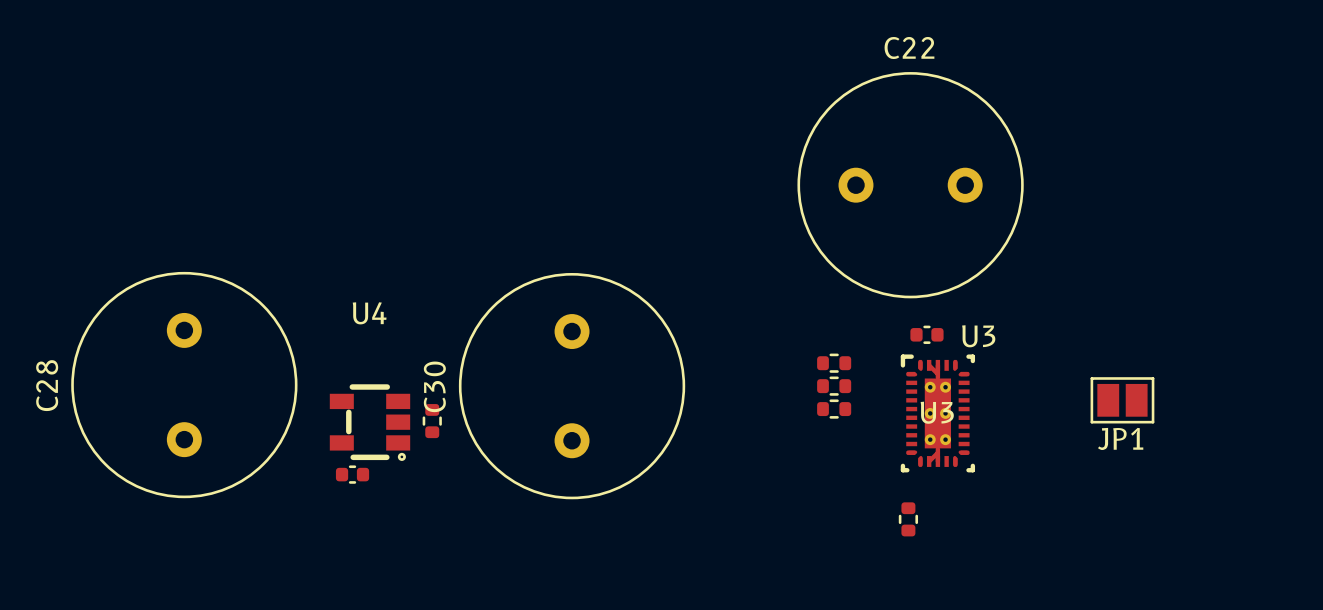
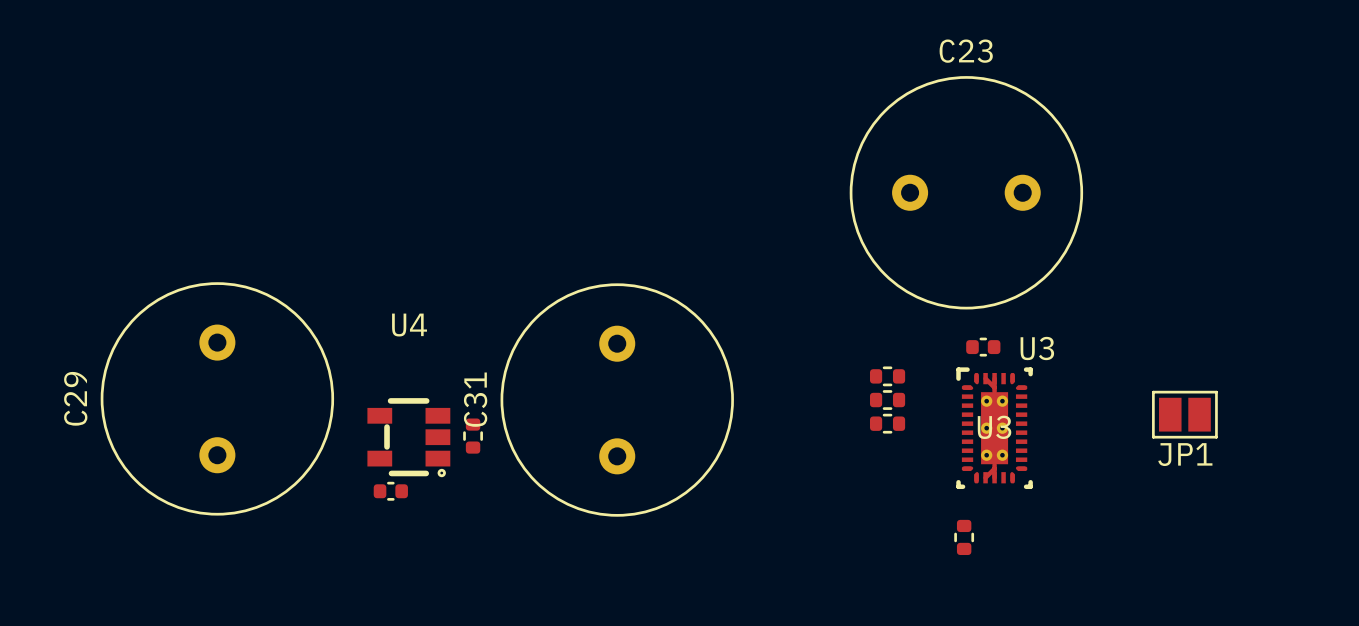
C22 name: C22 (909, 48) -> C23 (966, 51)
C28 name: C28 (47, 385) -> C29 (75, 398)
C30 name: C30 (434, 386) -> C31 (475, 399)

